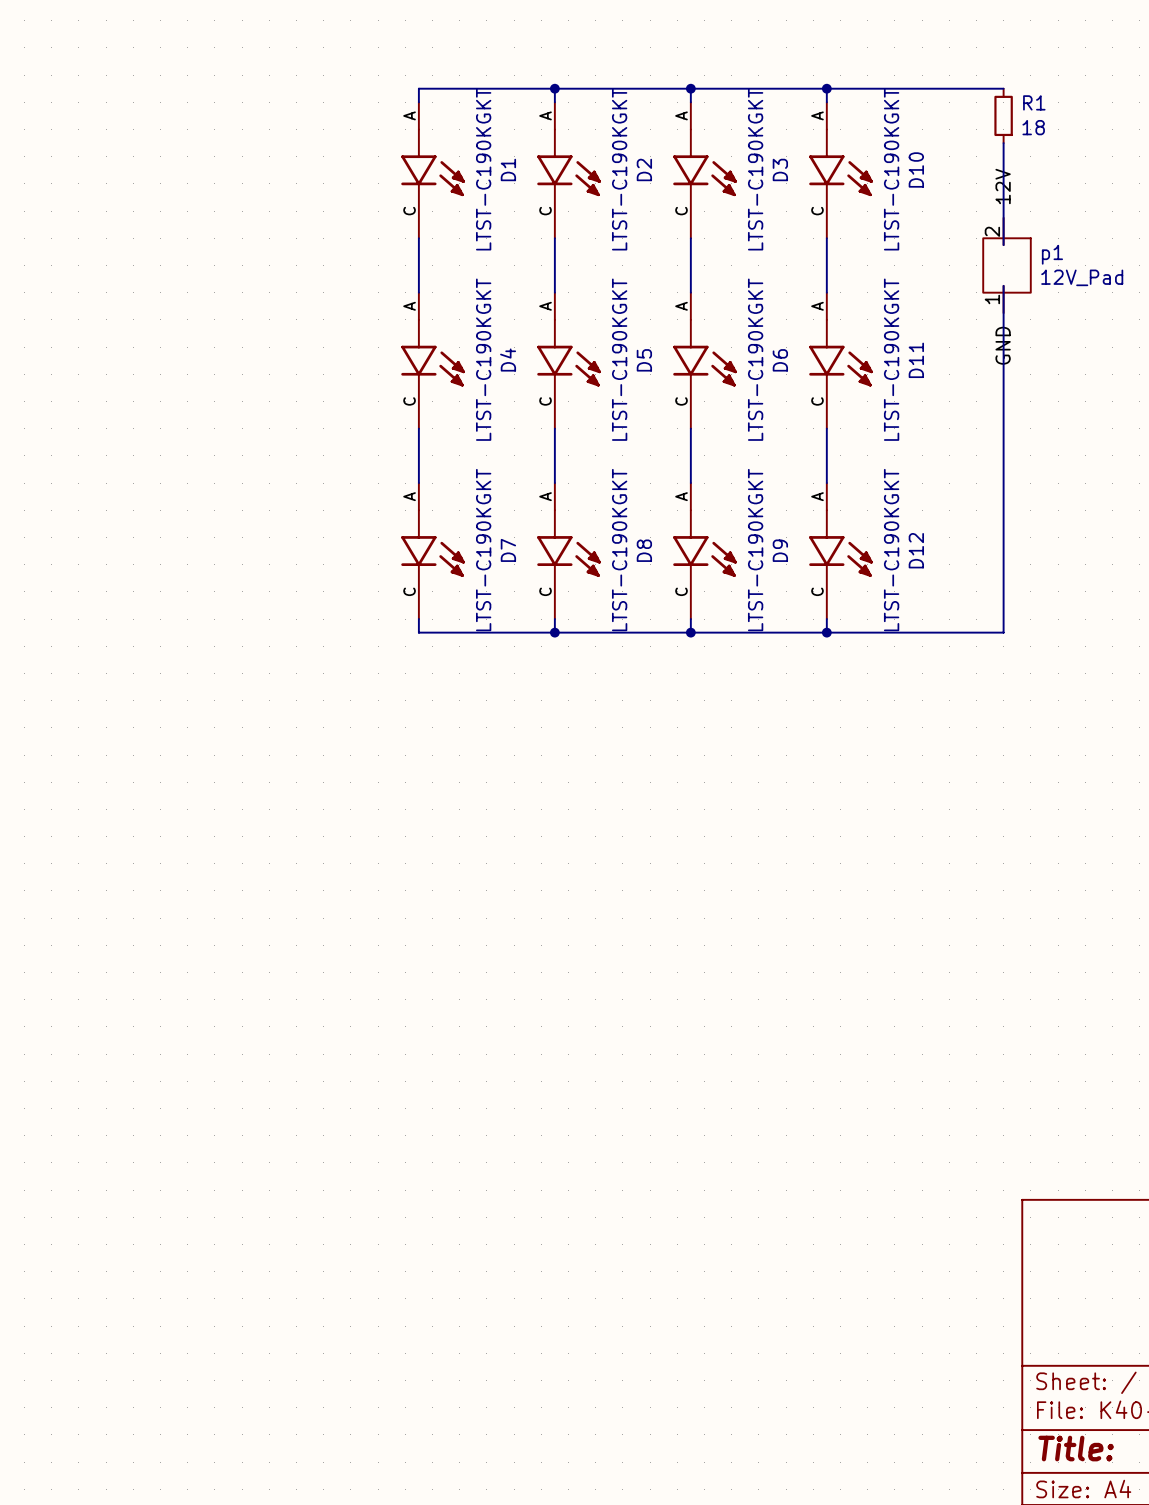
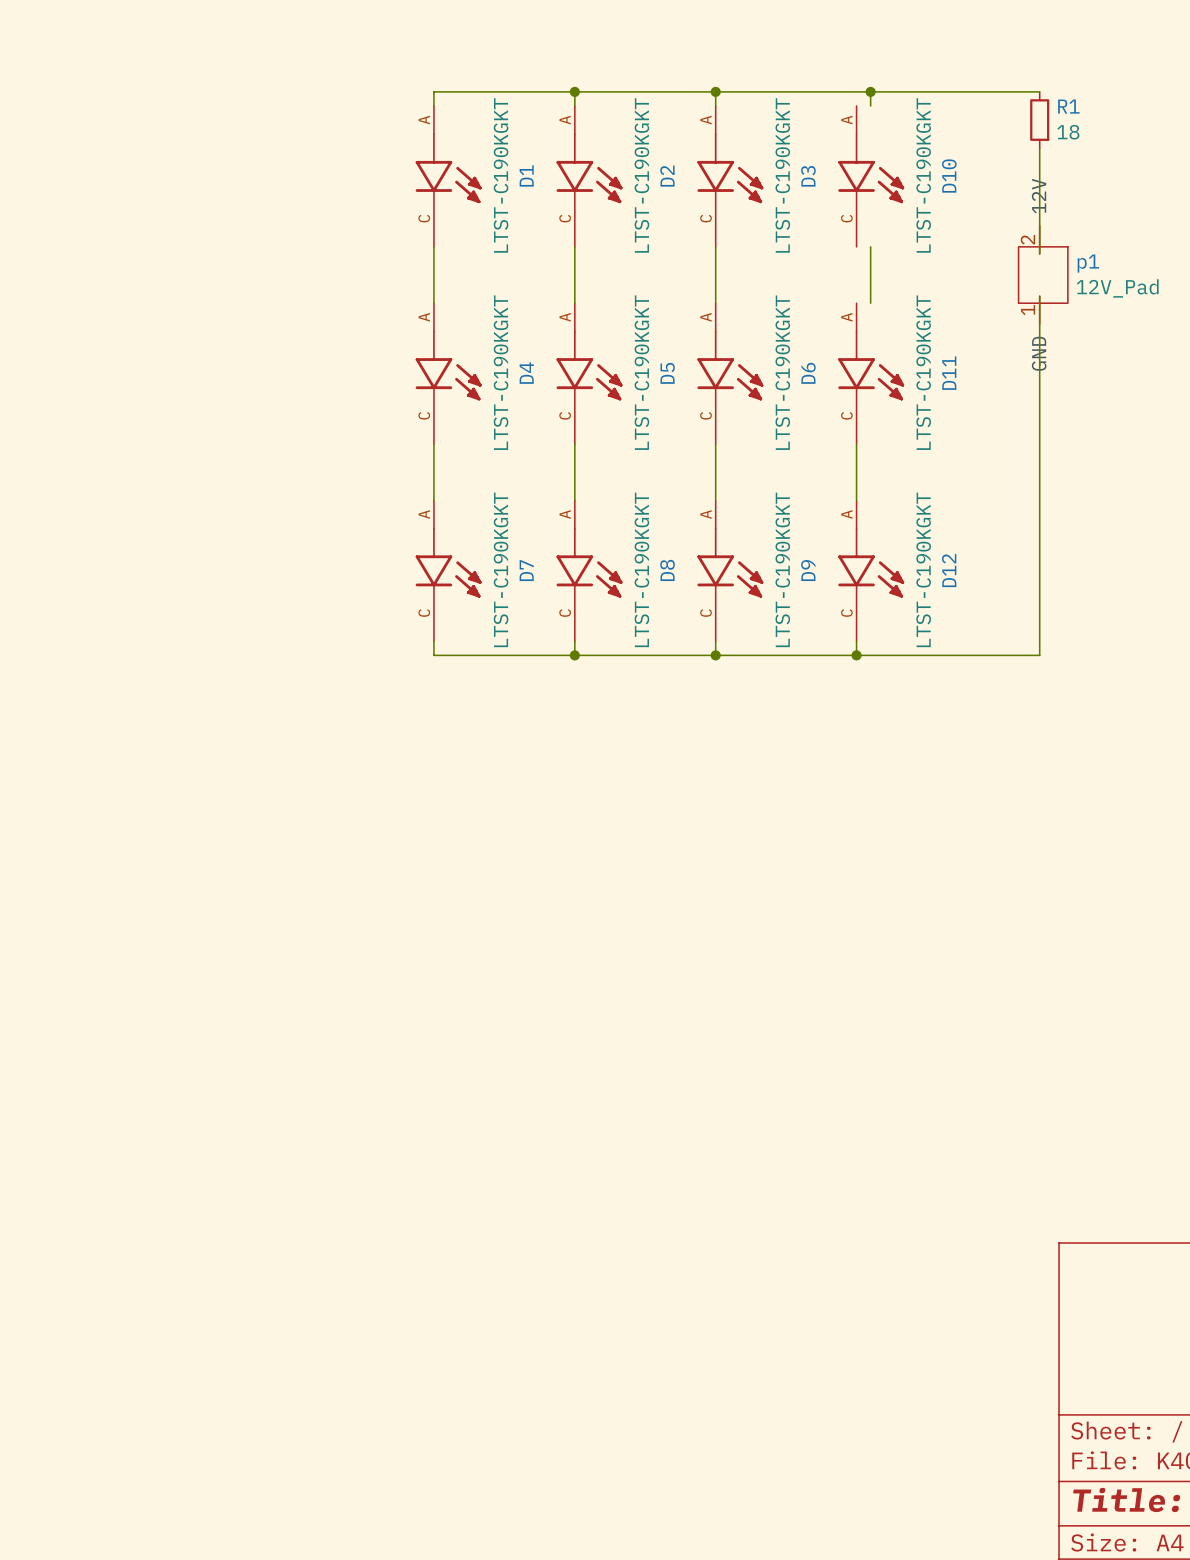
wire: (826, 88) (826, 102) -> (870, 91) (870, 105)
junction position: (826, 88) -> (870, 91)
wire: (826, 238) (826, 292) -> (870, 246) (870, 303)

